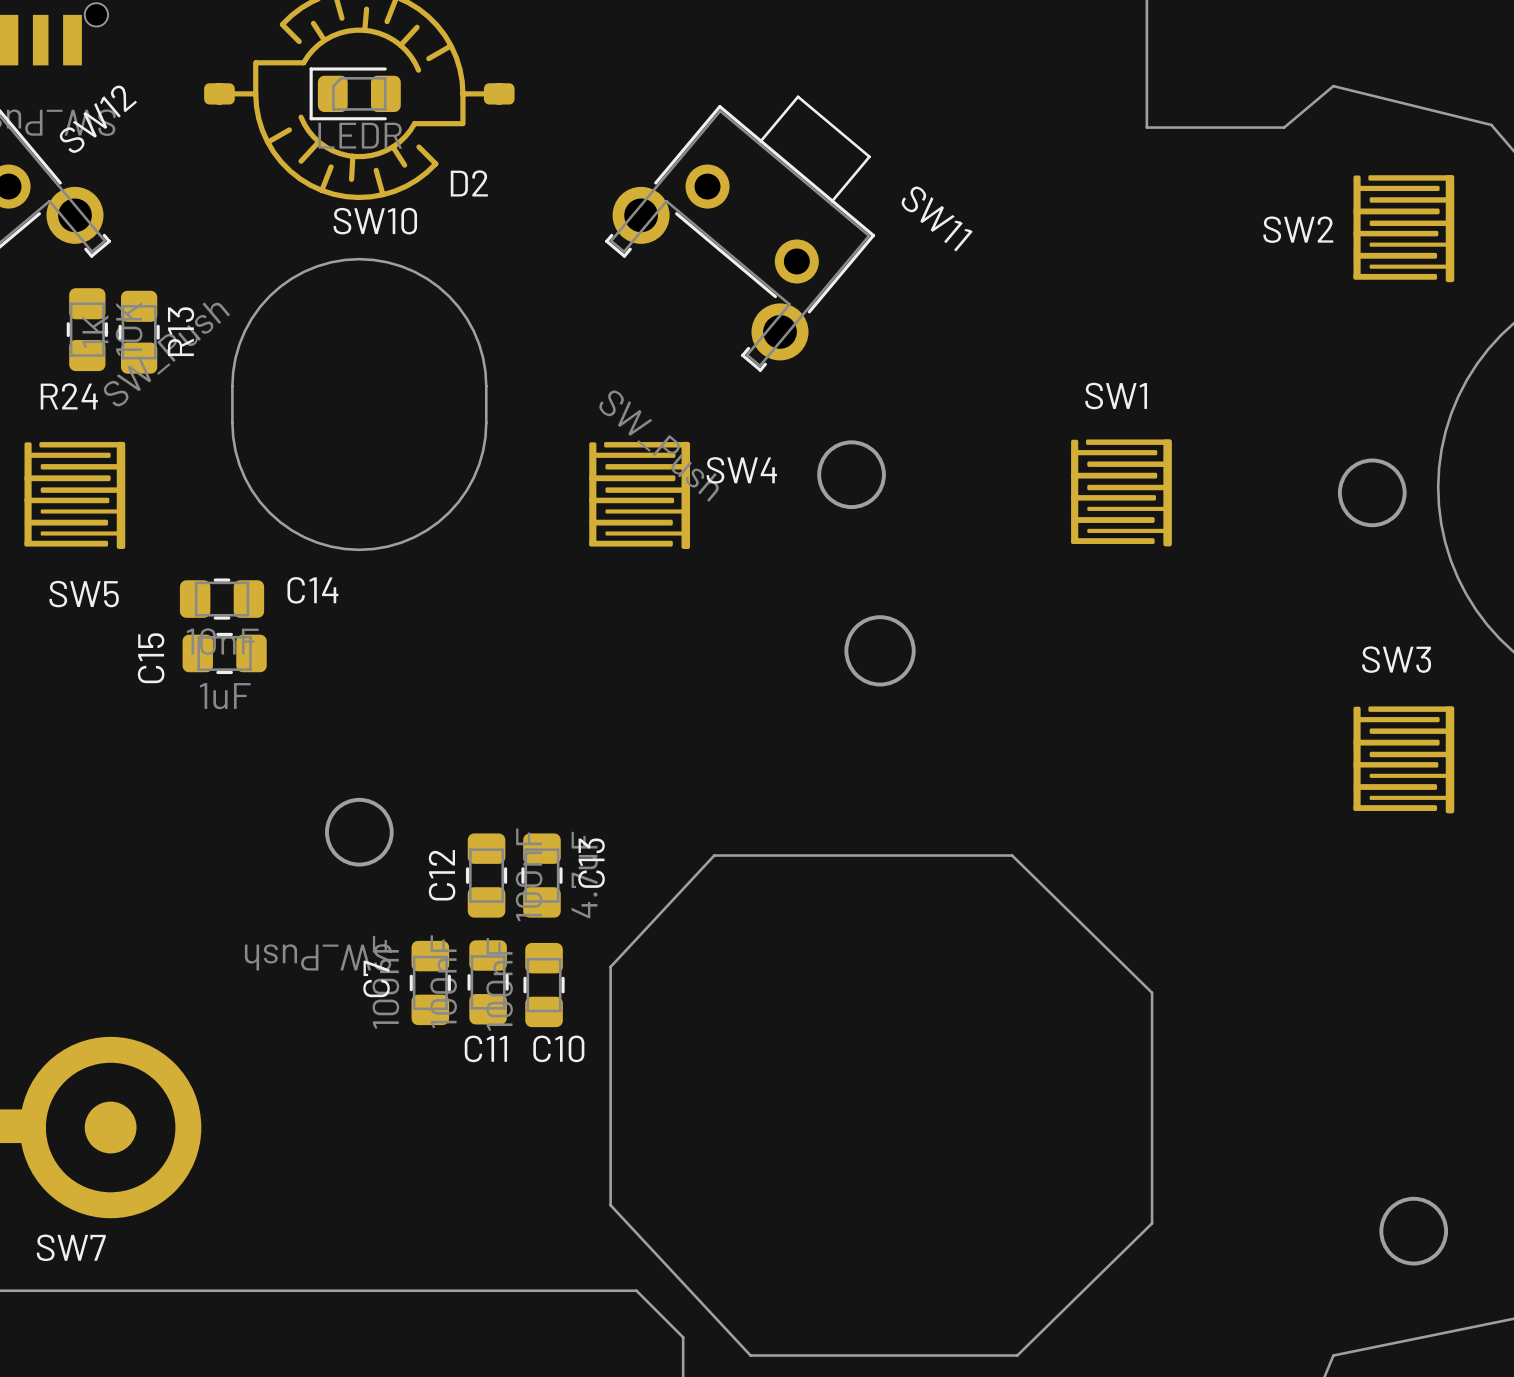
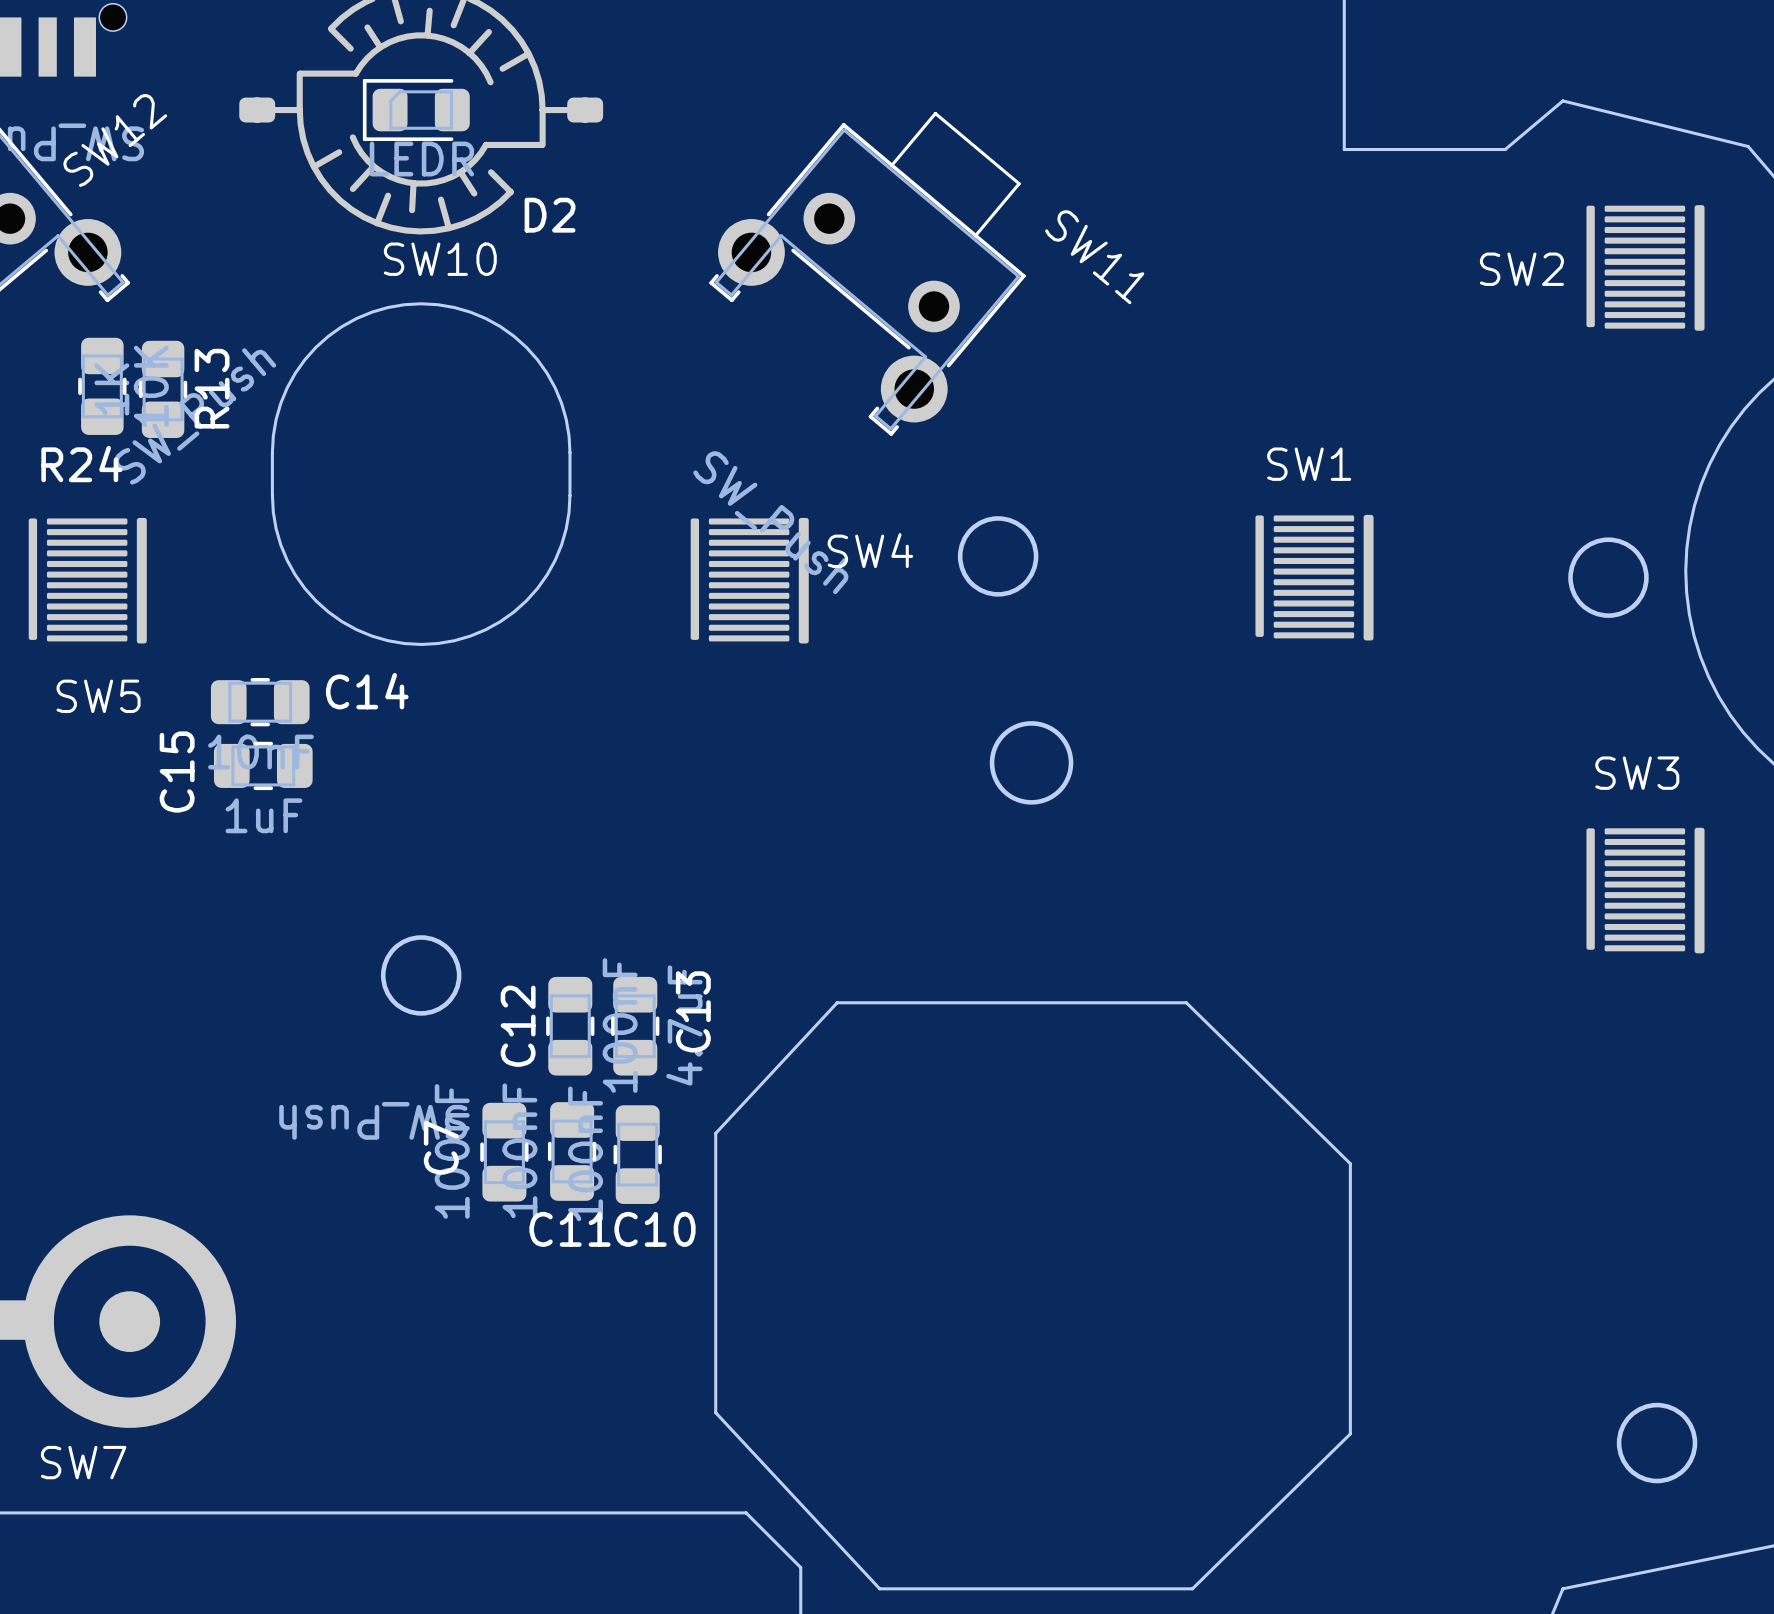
SW2 footprint: [1353, 175, 1455, 283] -> [1586, 205, 1705, 331]
SW1 footprint: [1071, 439, 1172, 547] -> [1255, 514, 1374, 641]
SW5 footprint: [24, 441, 126, 550] -> [28, 517, 147, 644]
SW4 footprint: [589, 441, 691, 550] -> [690, 517, 809, 644]
SW3 footprint: [1353, 706, 1455, 814] -> [1586, 827, 1705, 954]

